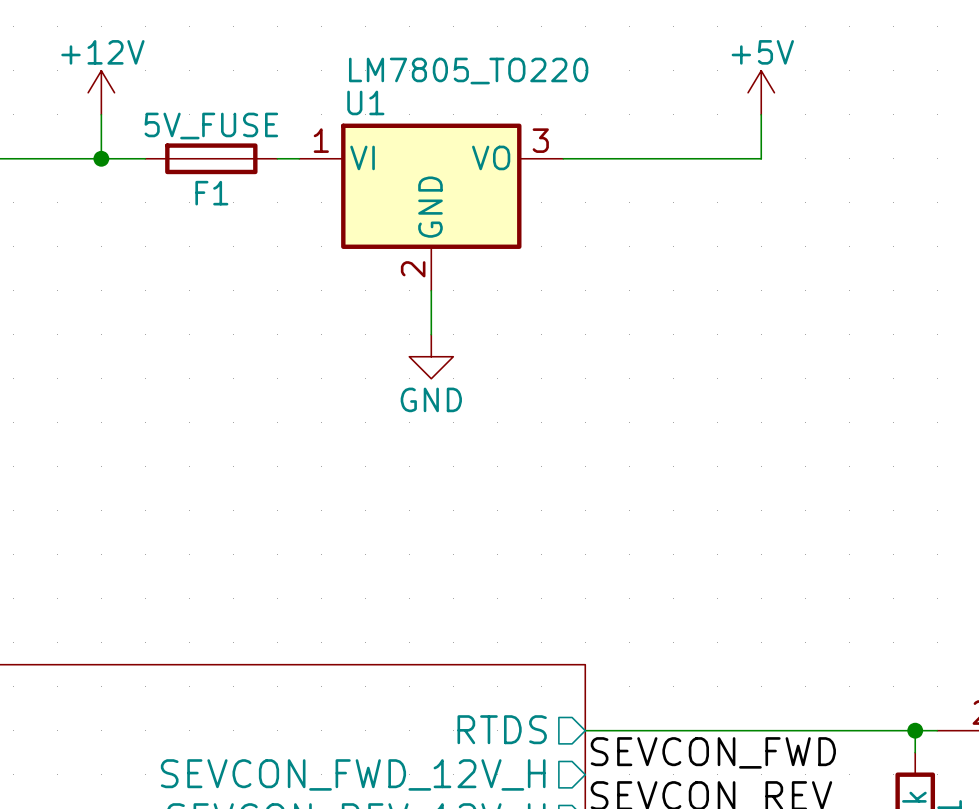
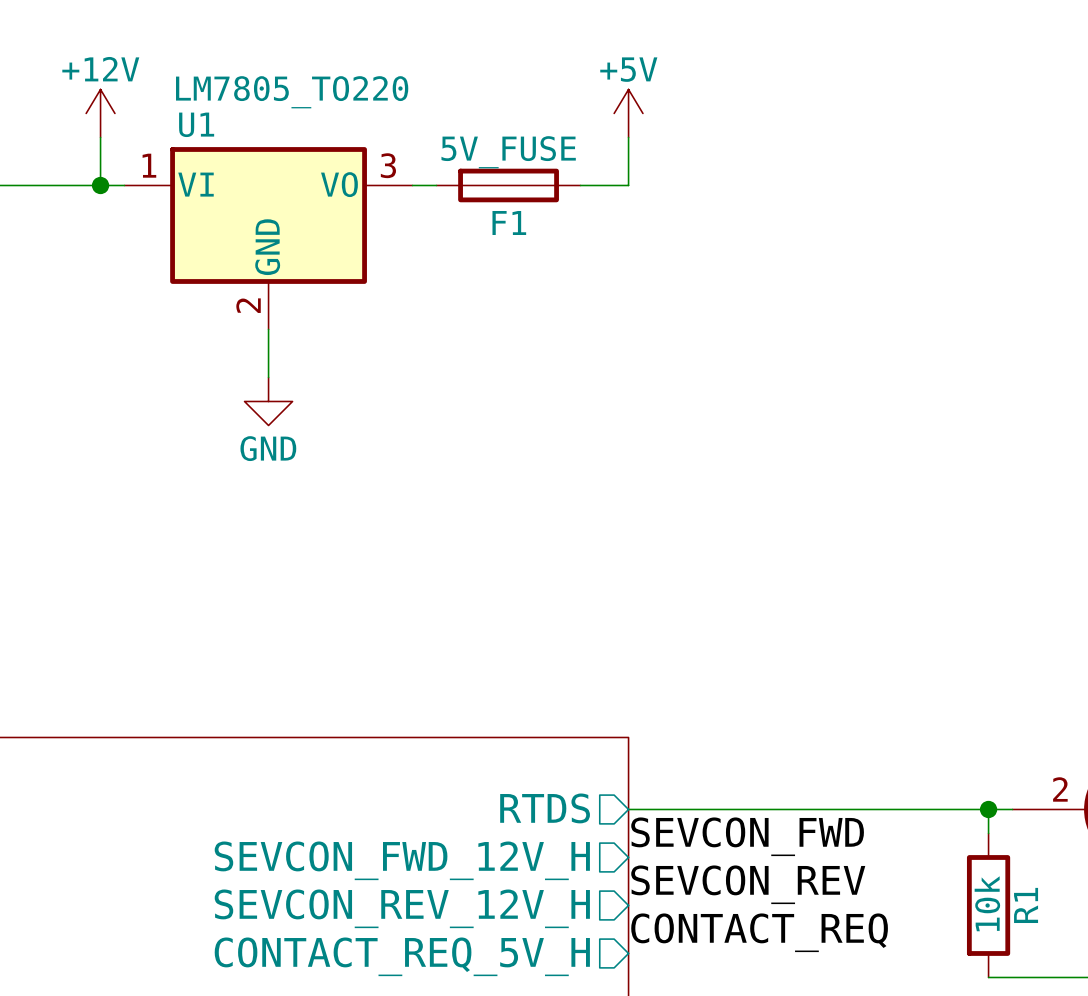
power symbol position: +5V (761, 92) -> +5V (628, 113)
wire: (761, 114) (761, 158) (585, 158) -> (628, 137) (628, 185)
F1 position: (211, 158) -> (508, 185)
U1 position: (431, 207) -> (268, 238)
wire: (431, 290) (431, 334) -> (268, 329) (268, 377)
power symbol position: GND (431, 356) -> GND (268, 401)

